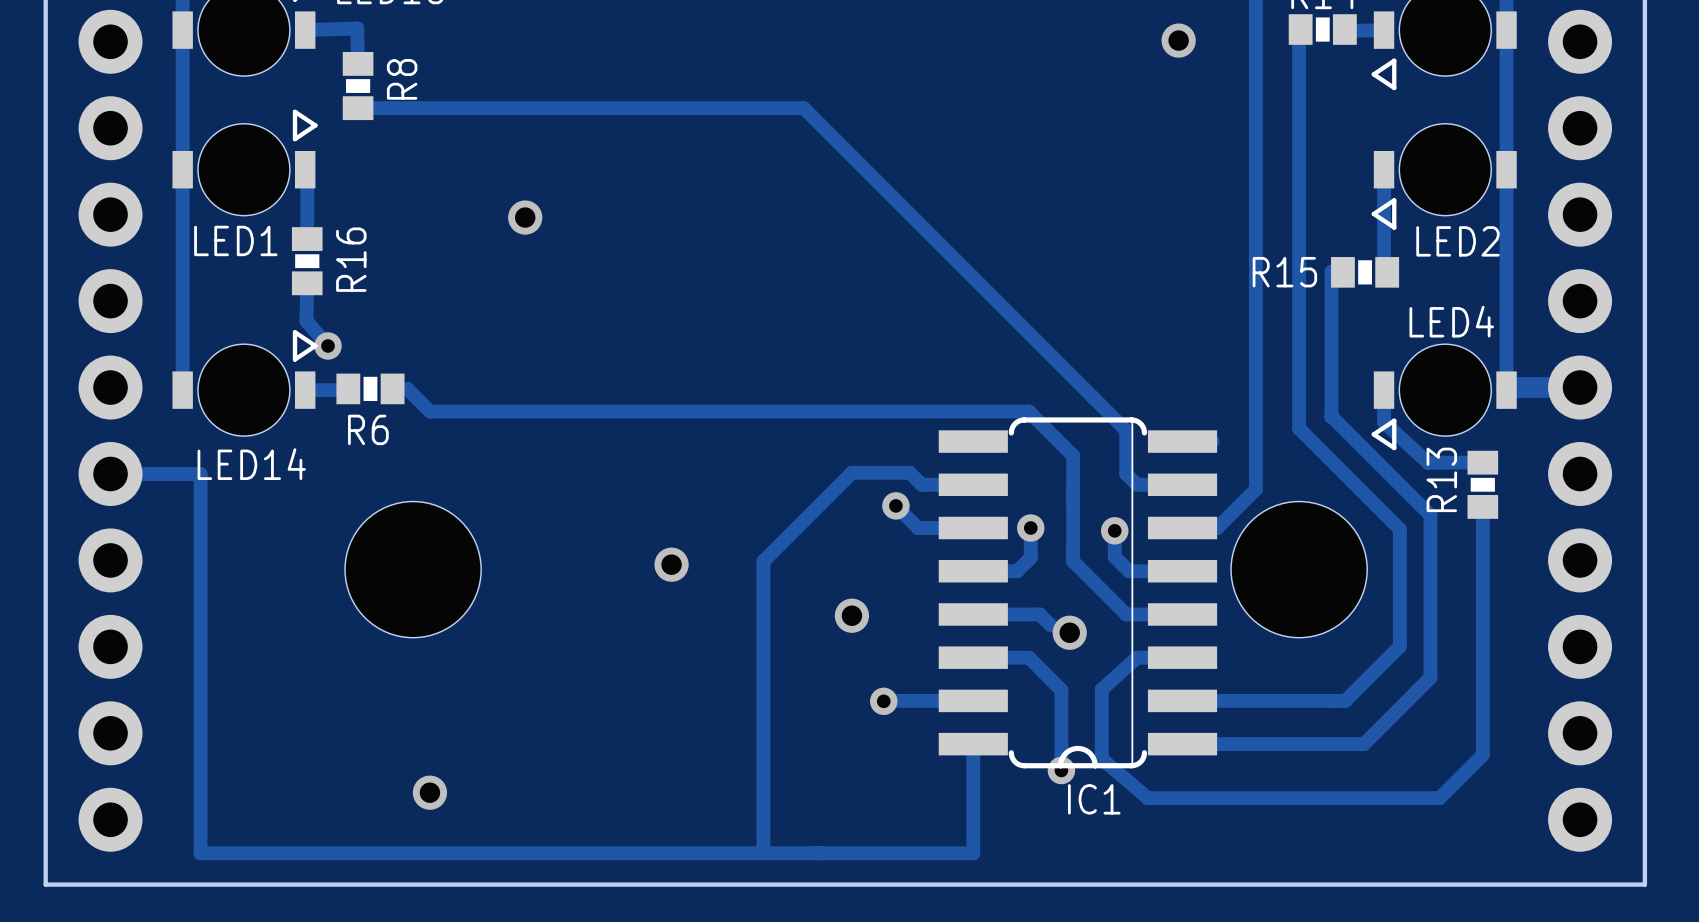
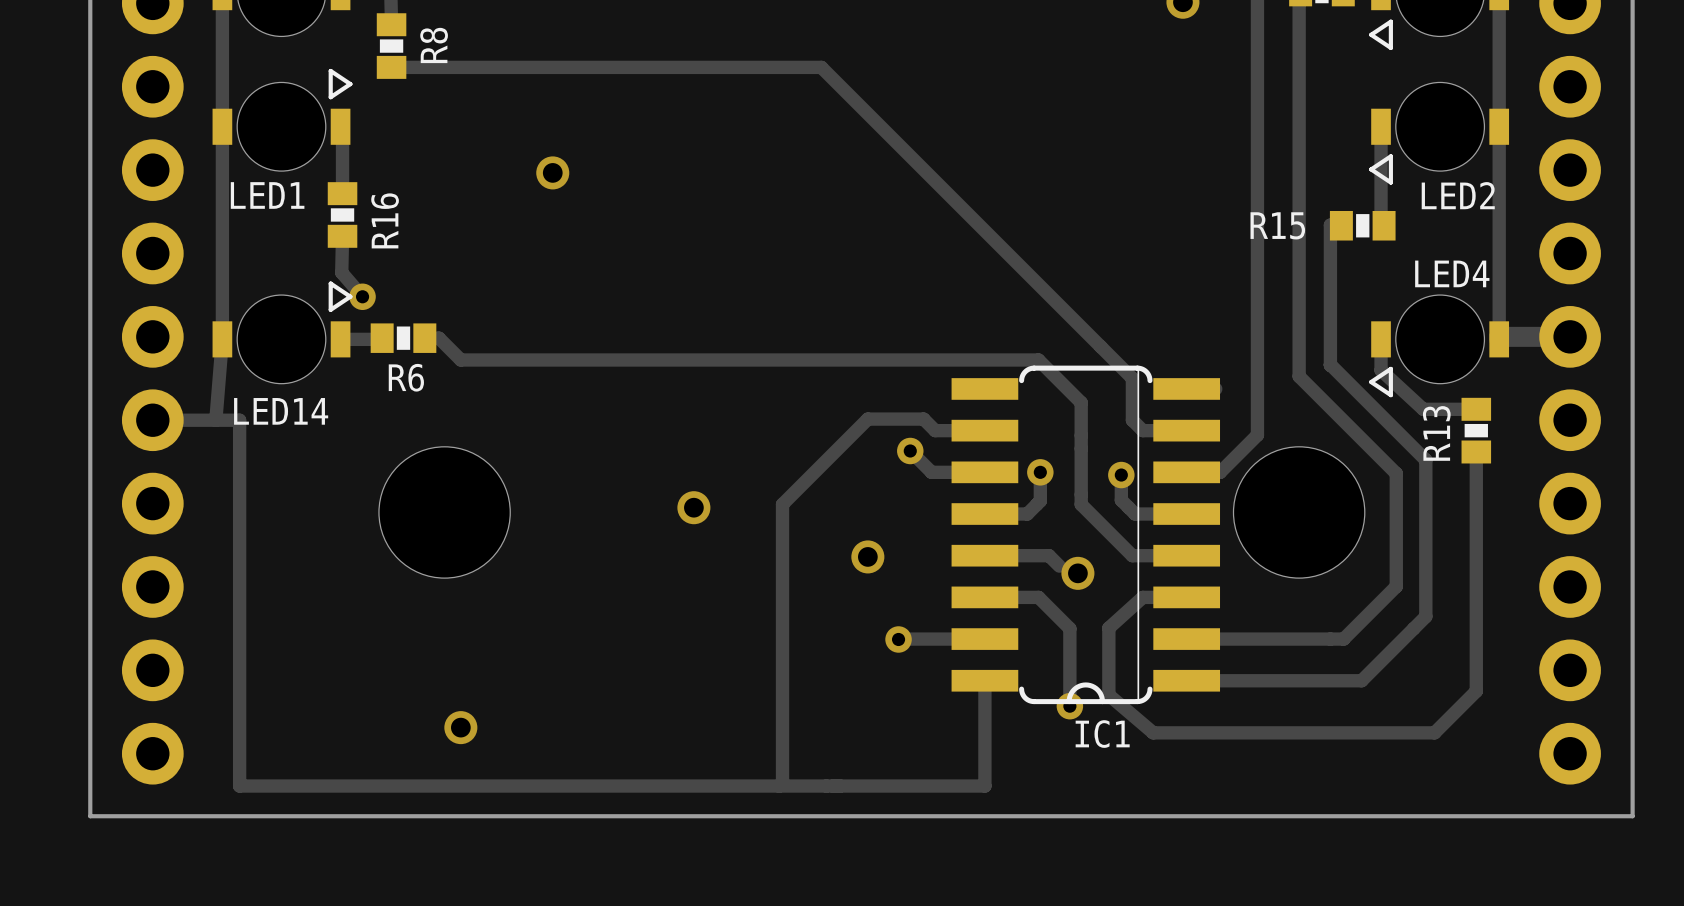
track: none -> (222, 339) (215, 420)

